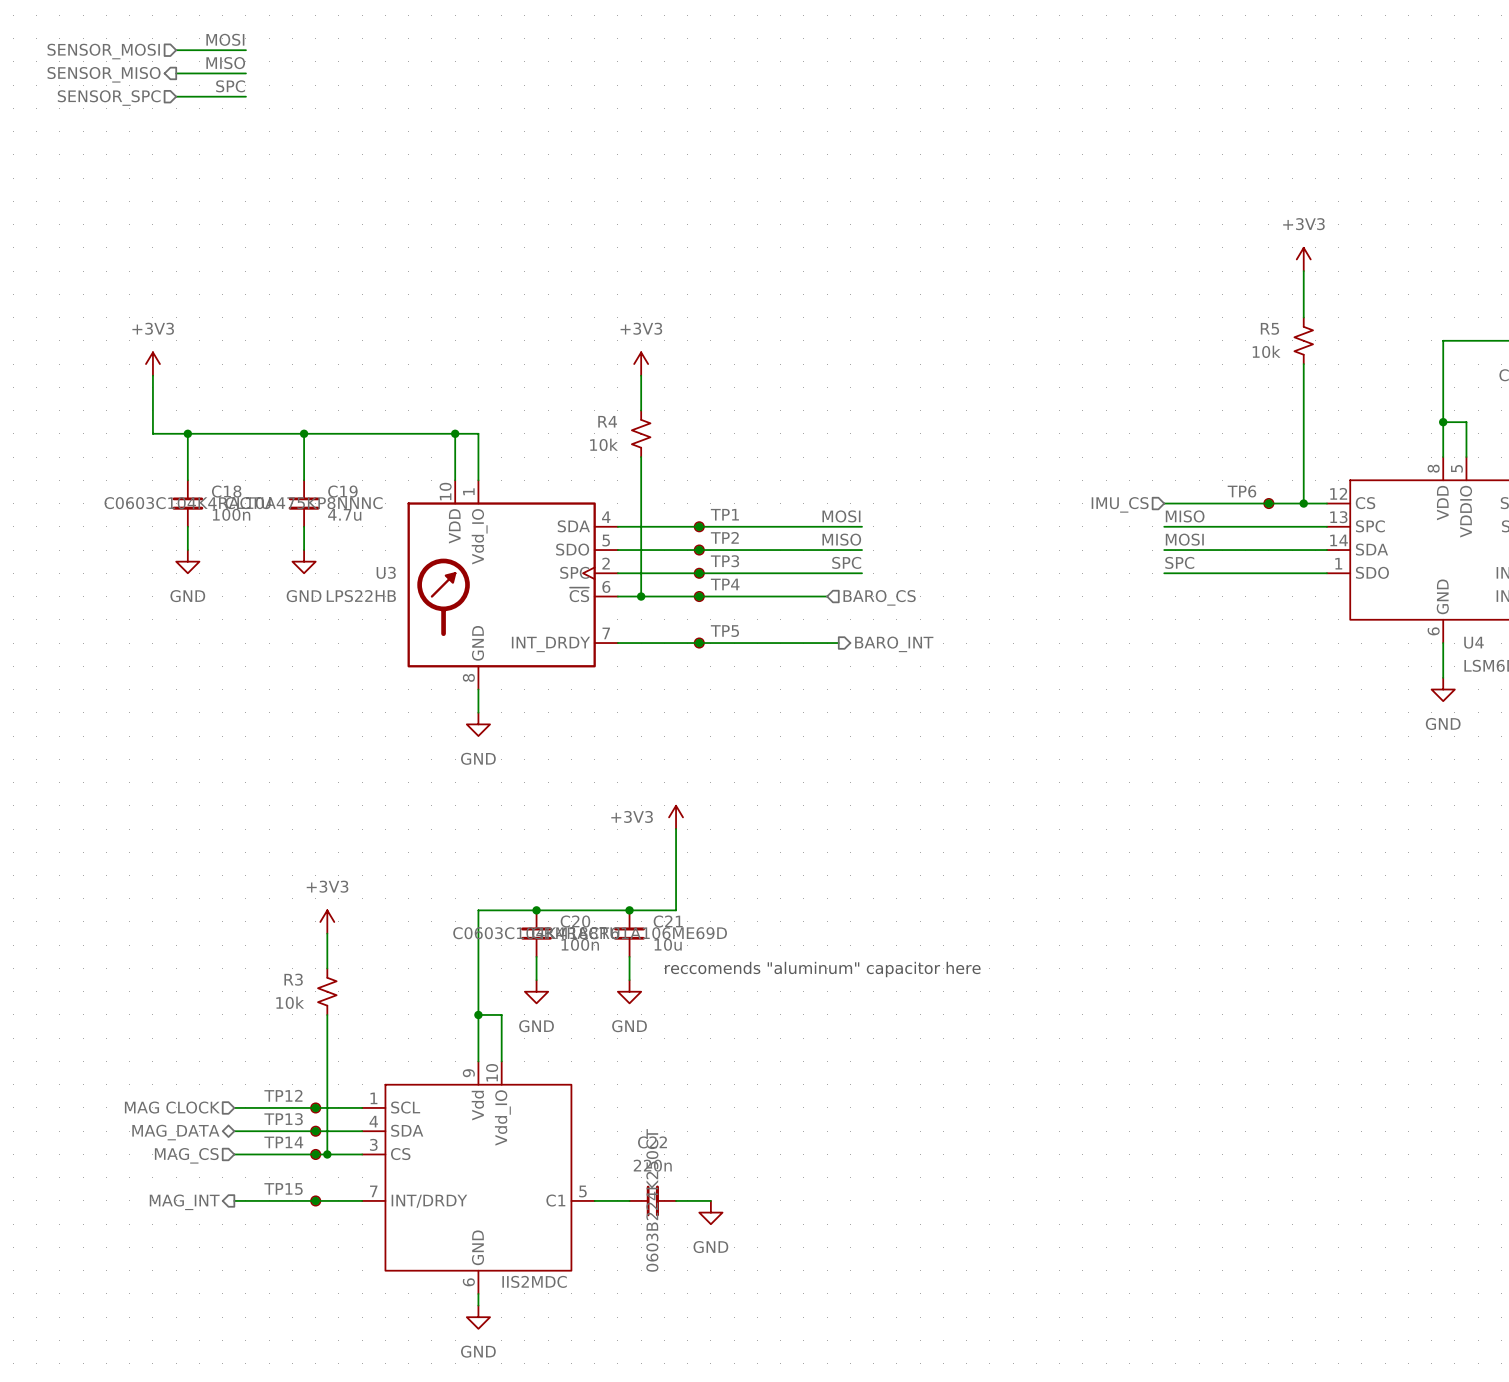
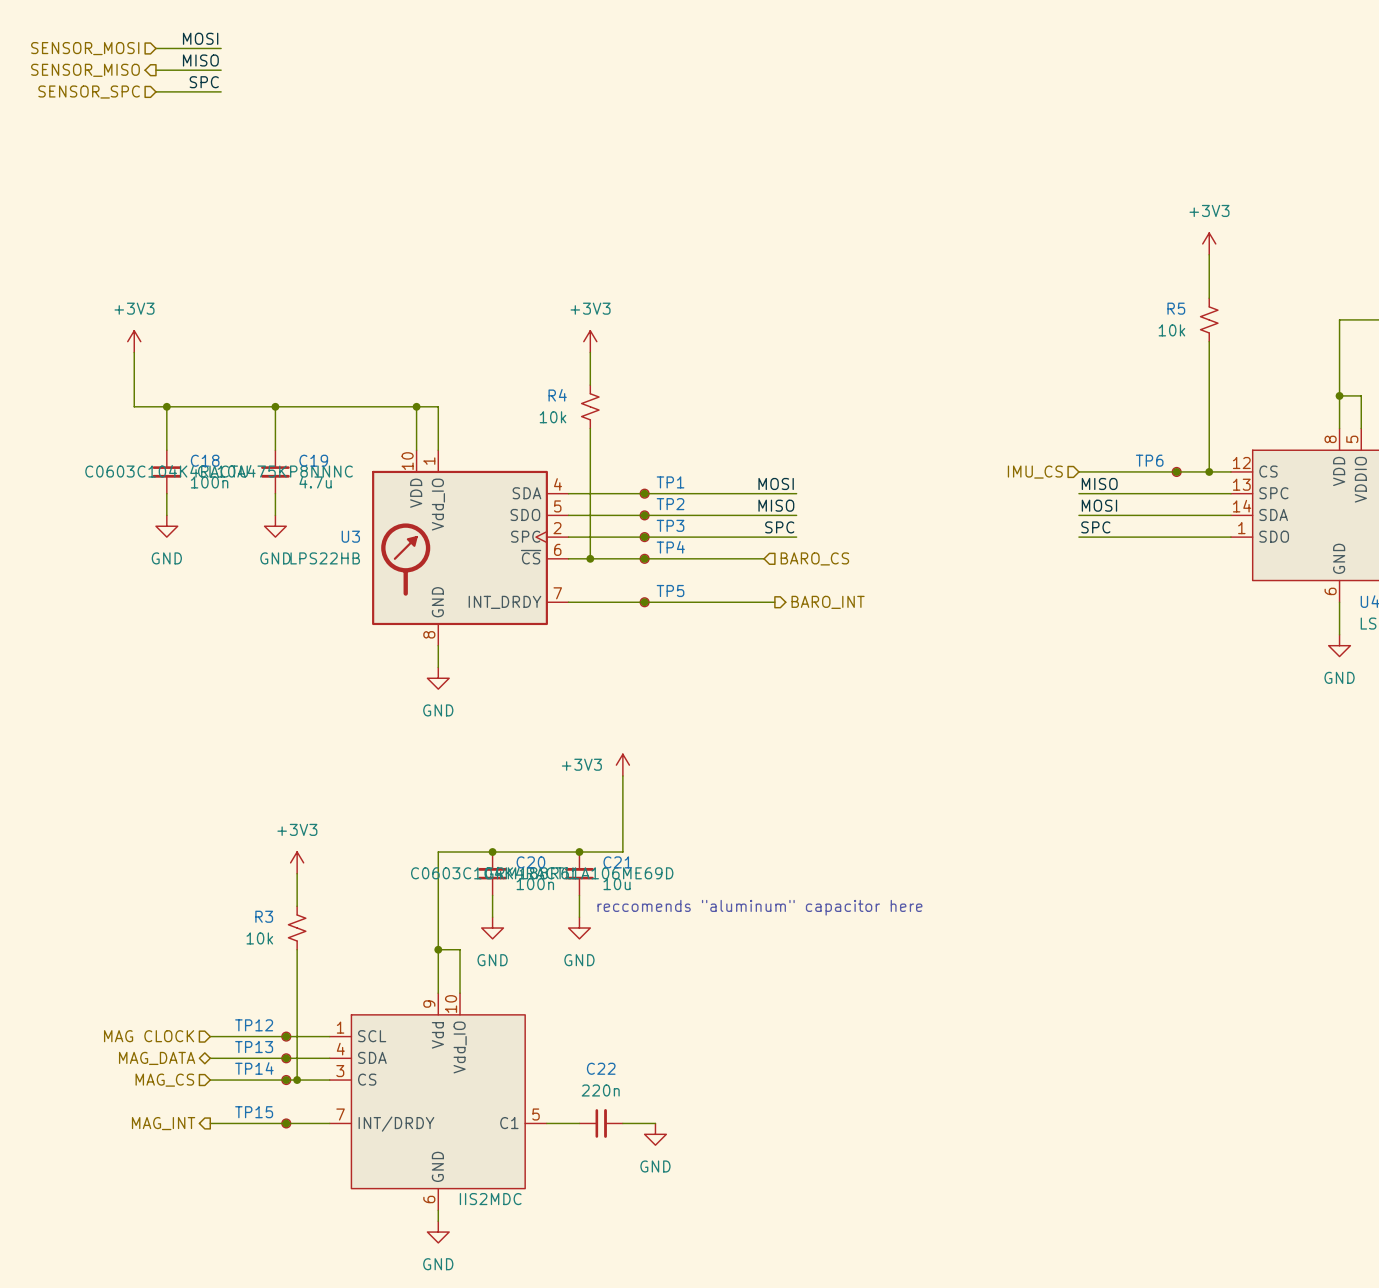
C22 text: 0603B224K250CT (652, 1200) -> none

